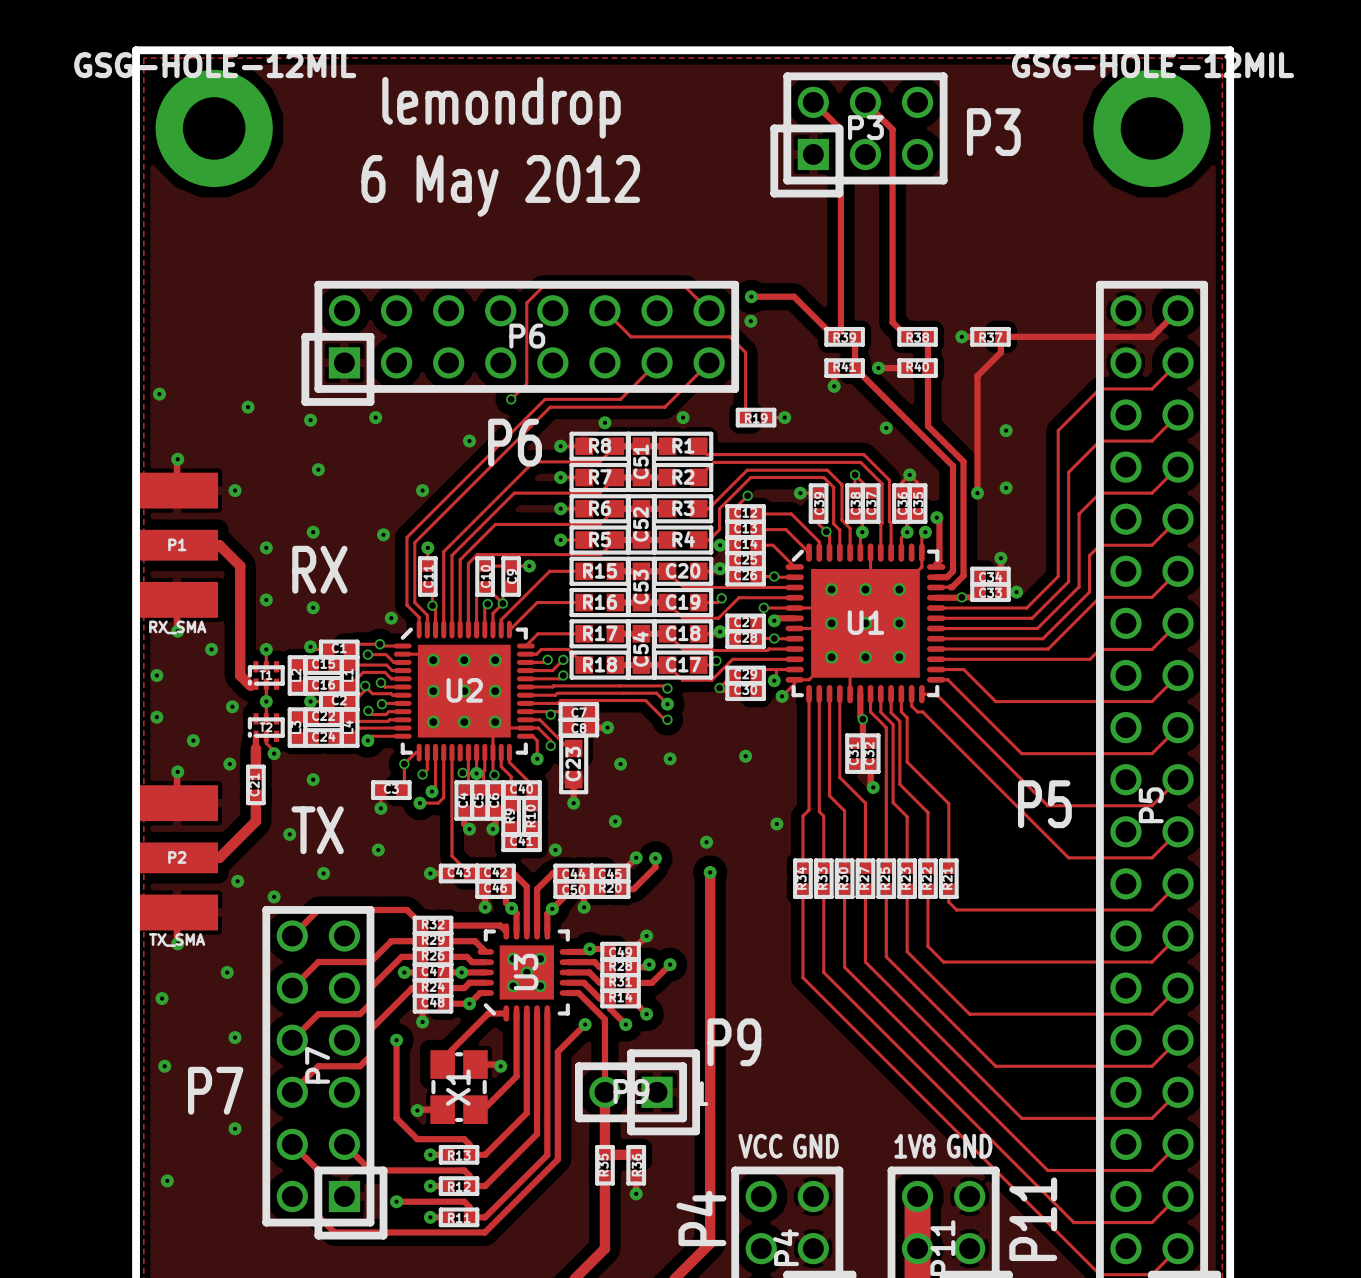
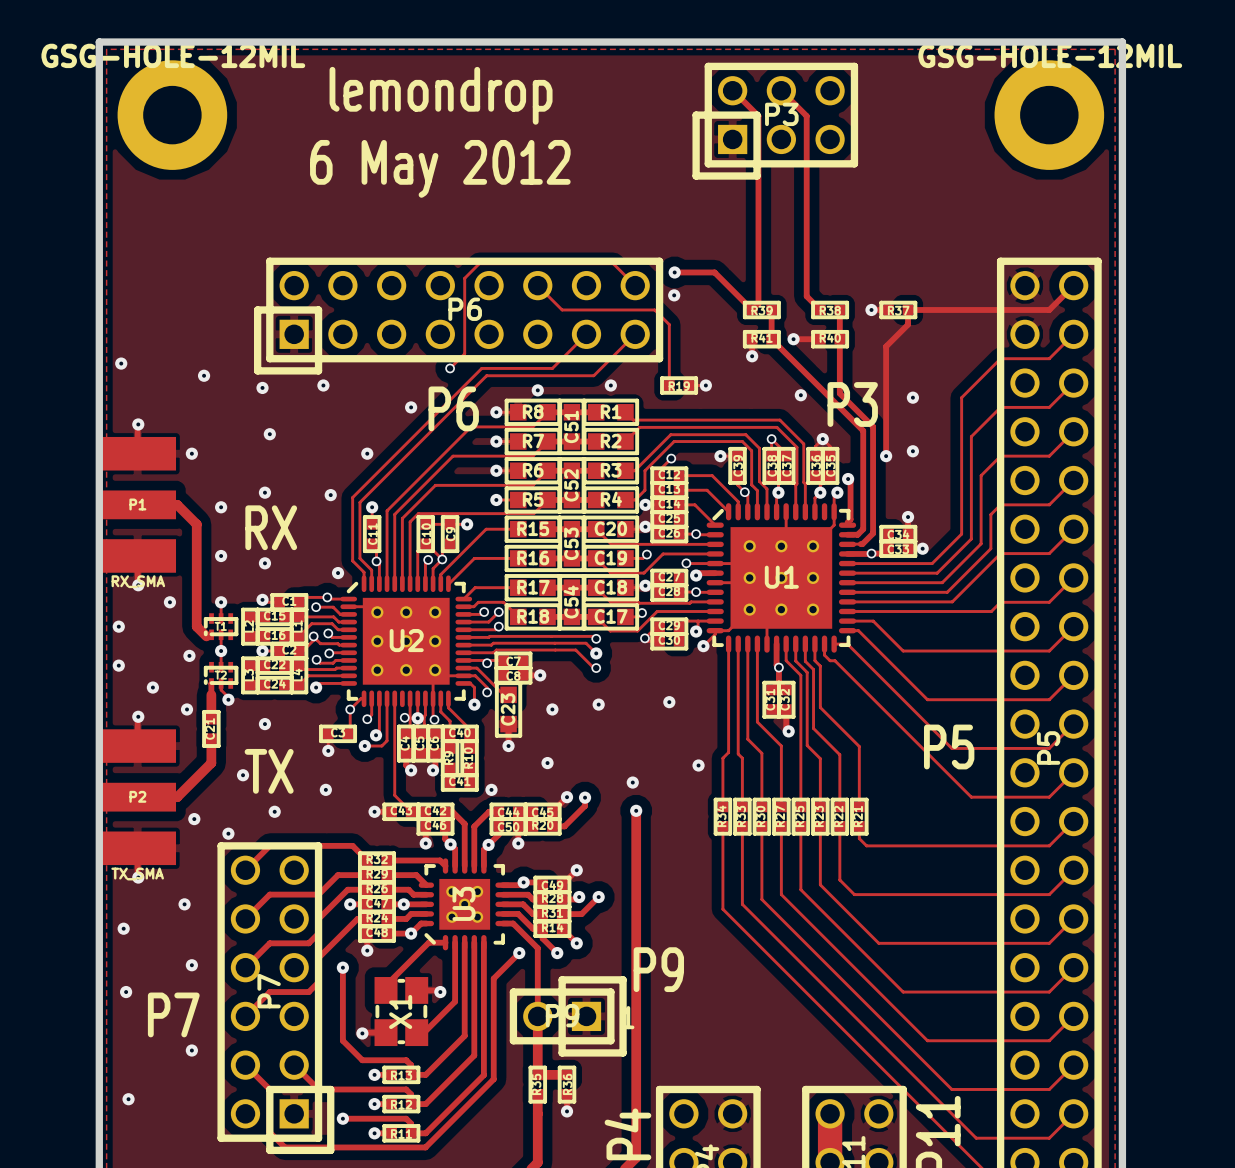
text position: P3 (993, 132) -> P3 (852, 404)
text: VCC (760, 1146) -> none
text: GND (815, 1146) -> none
text: 1V8 (914, 1146) -> none
text: GND (969, 1146) -> none

